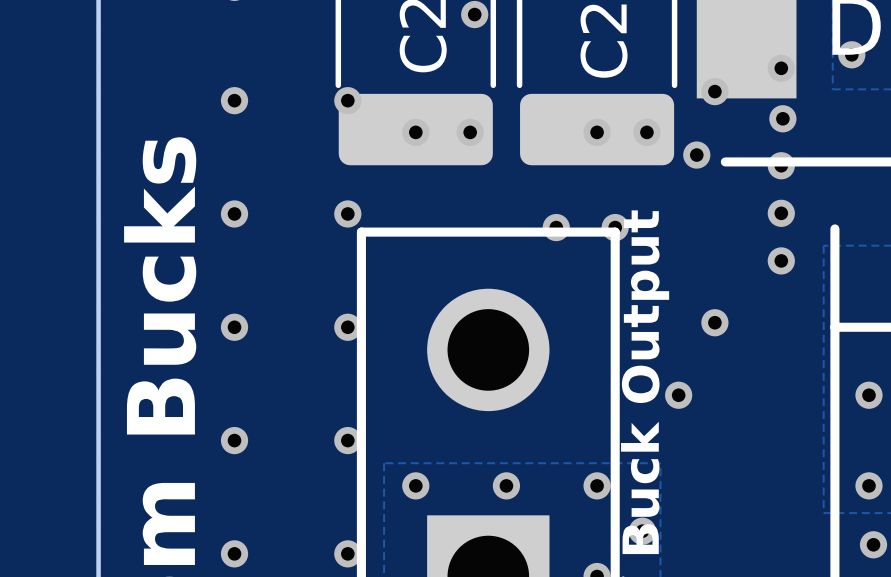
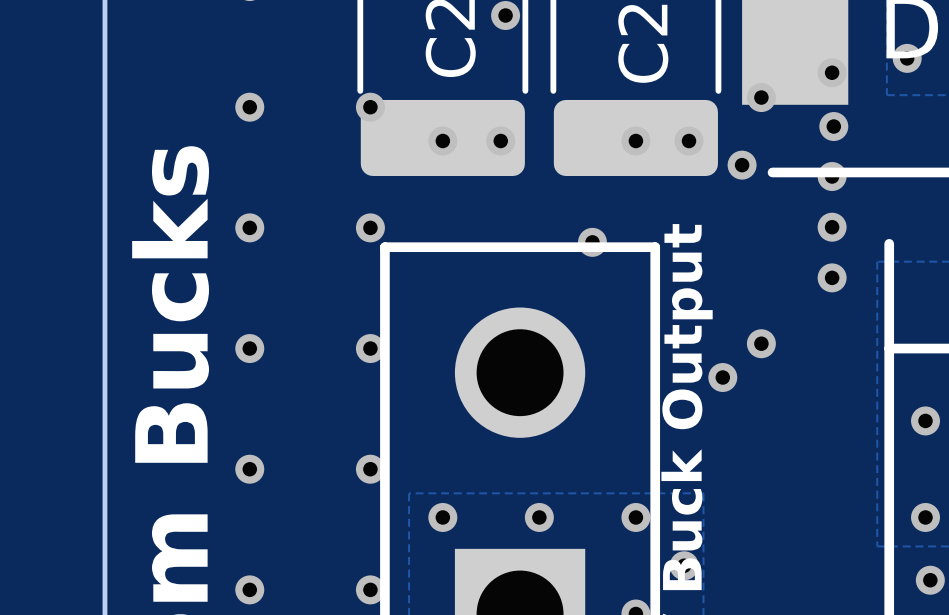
via: (615, 227) -> none
via position: (678, 395) -> (722, 377)

